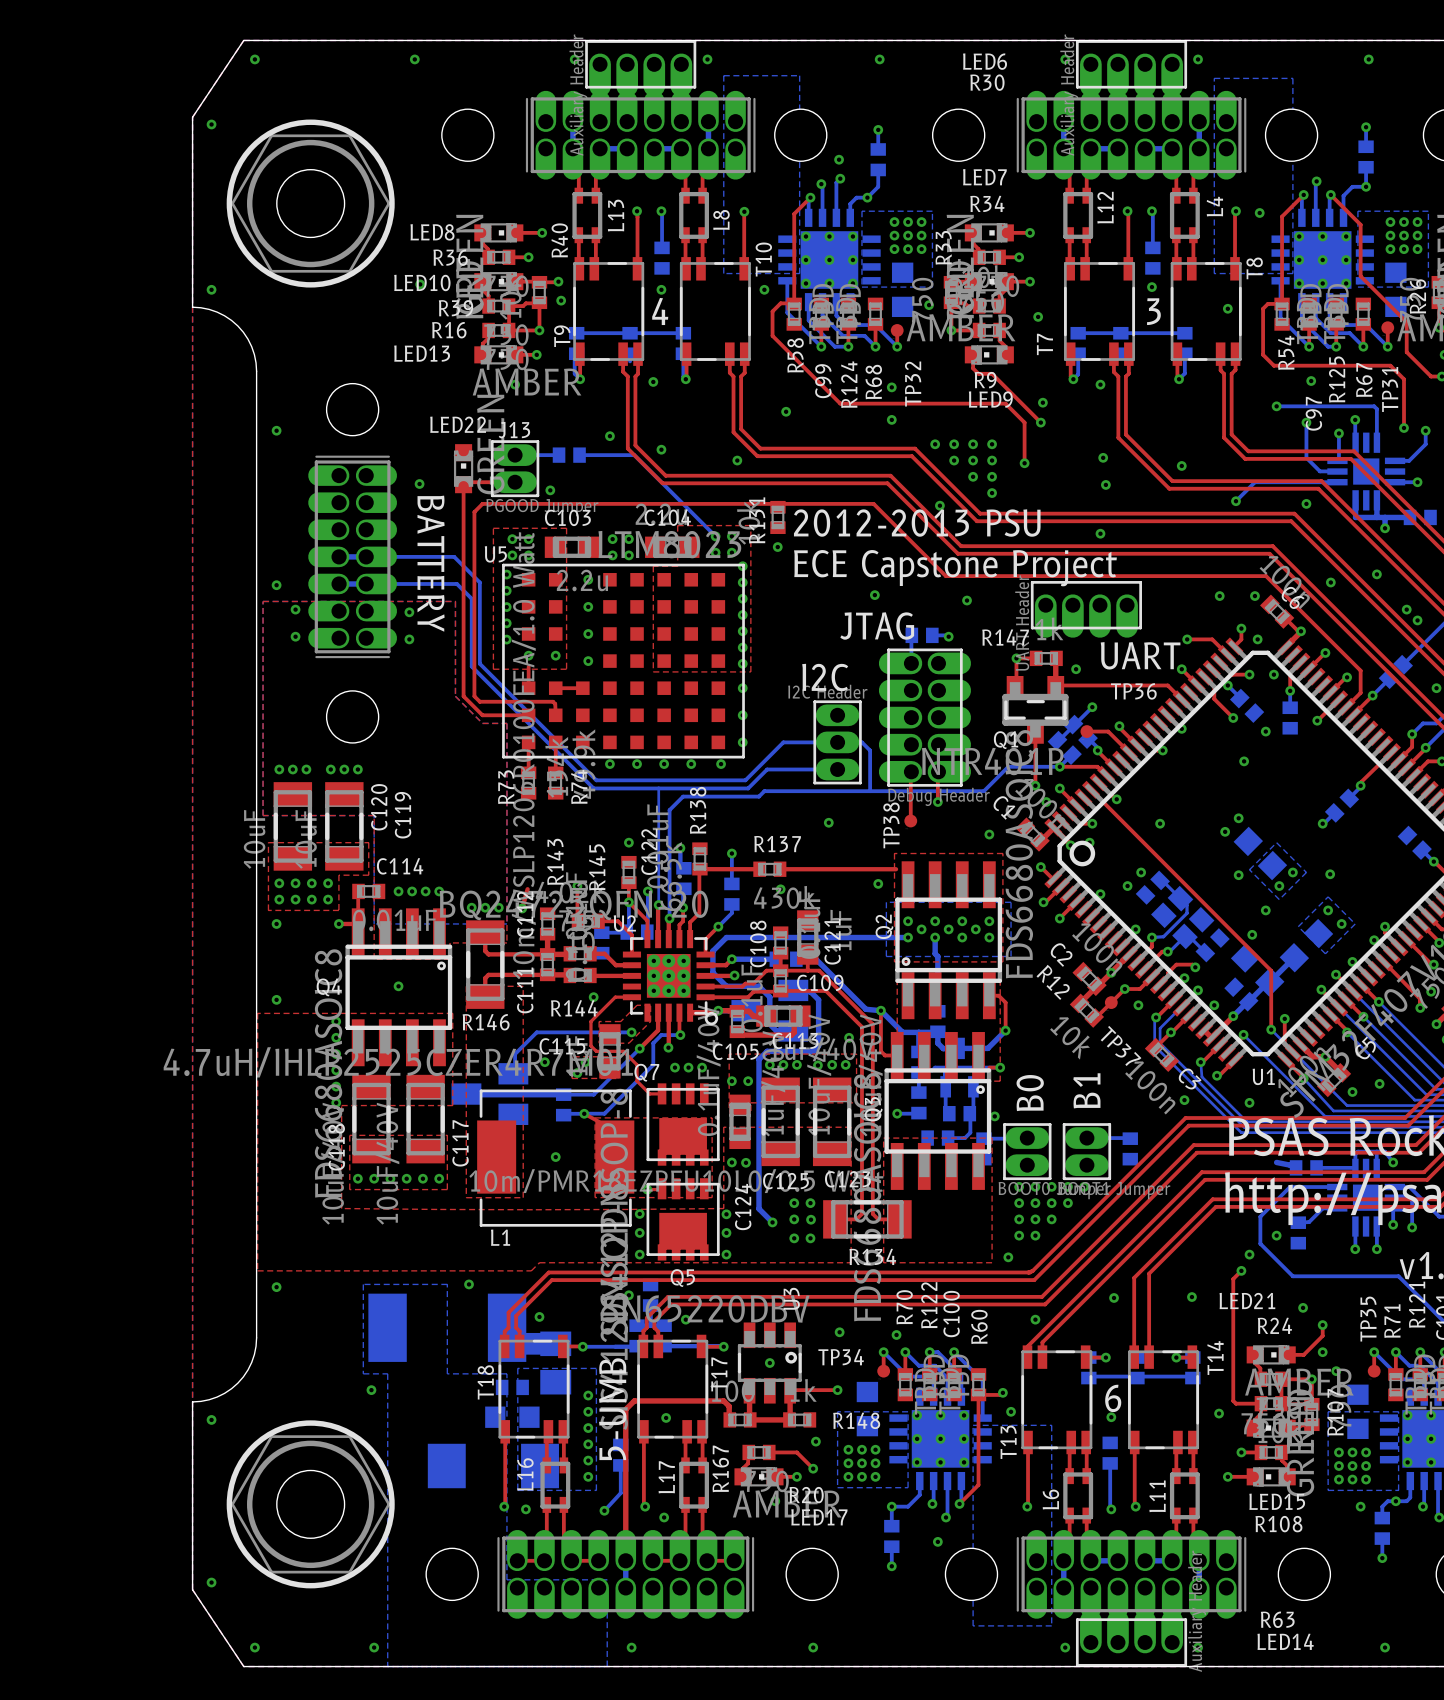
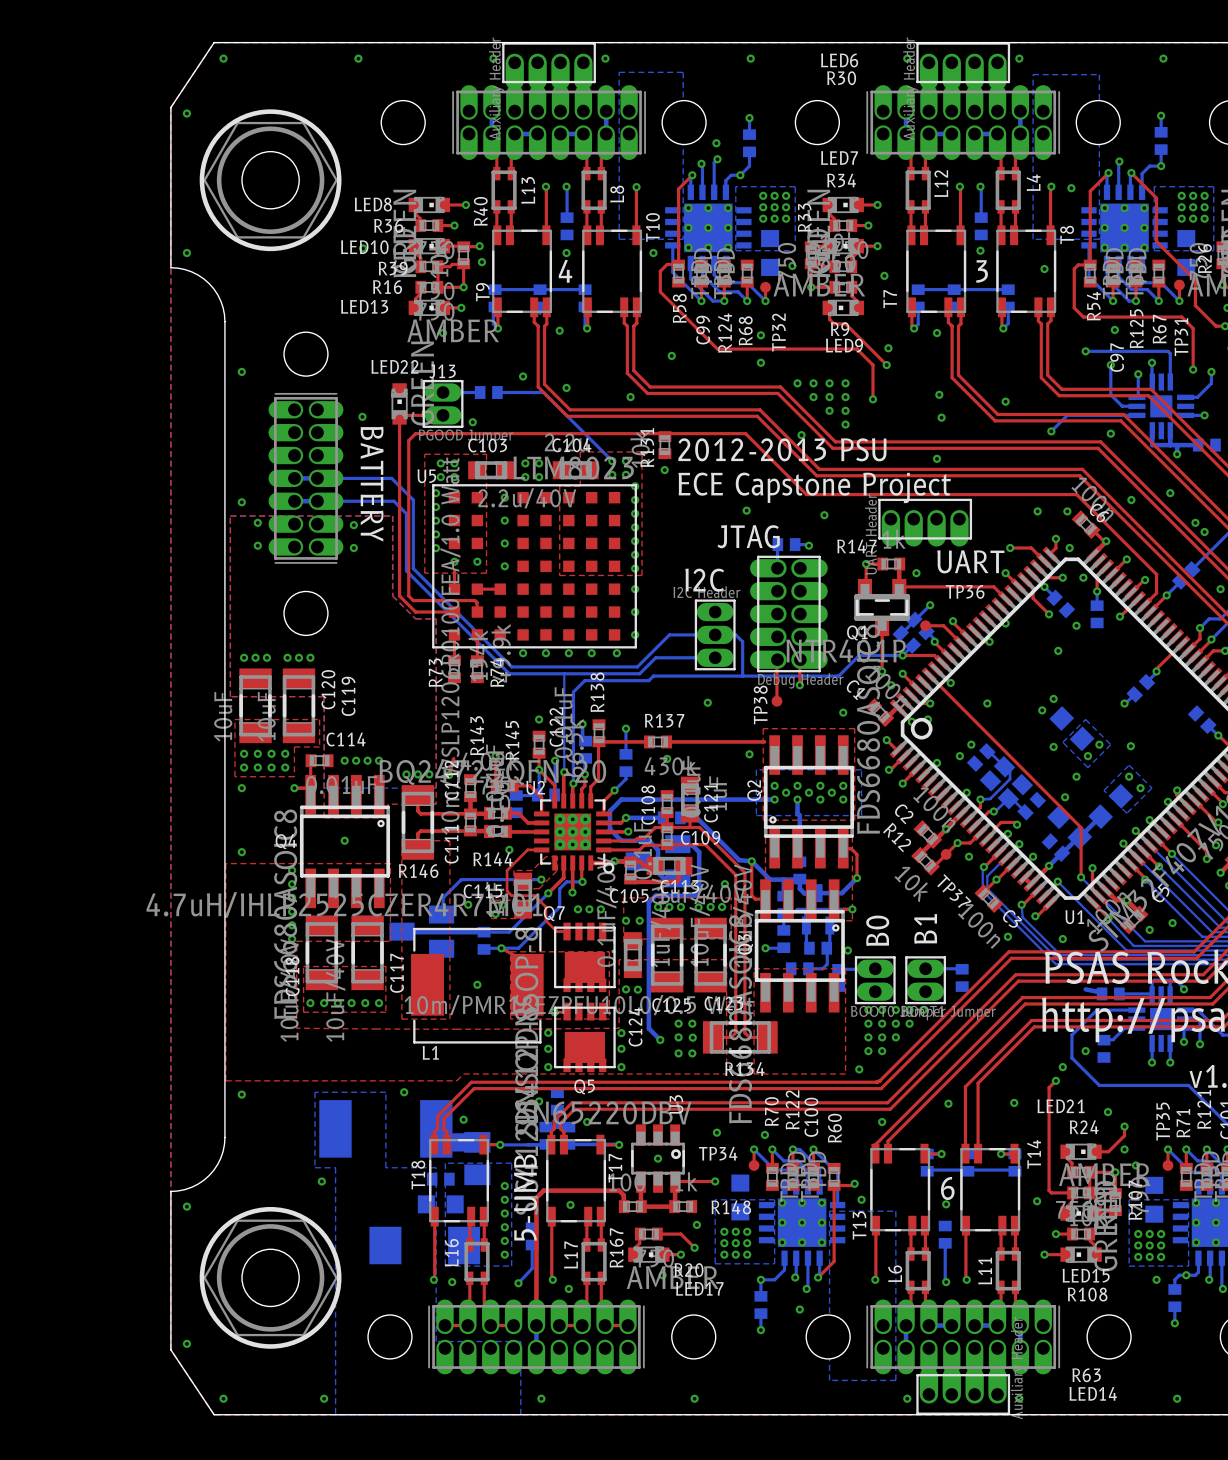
C103 value: 2.2u (582, 580) -> 2.2u/40V (527, 498)

